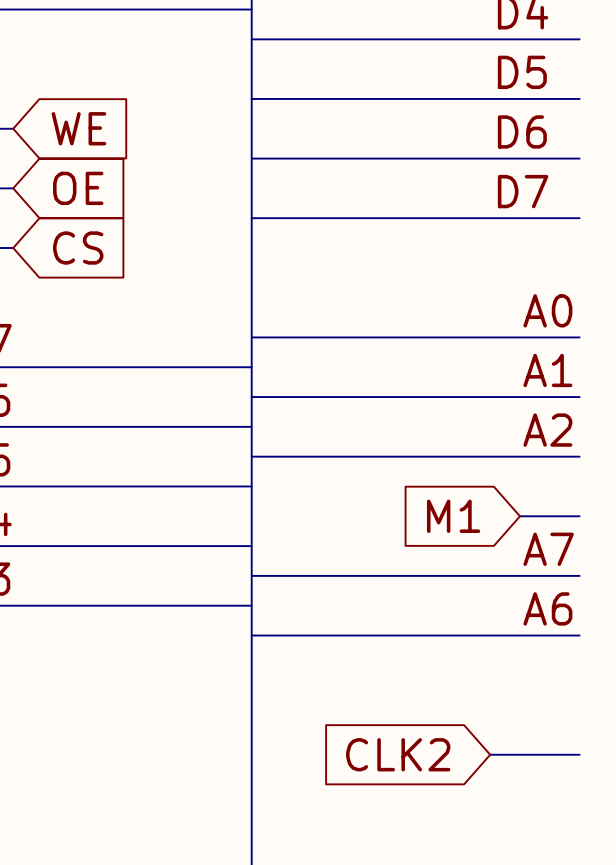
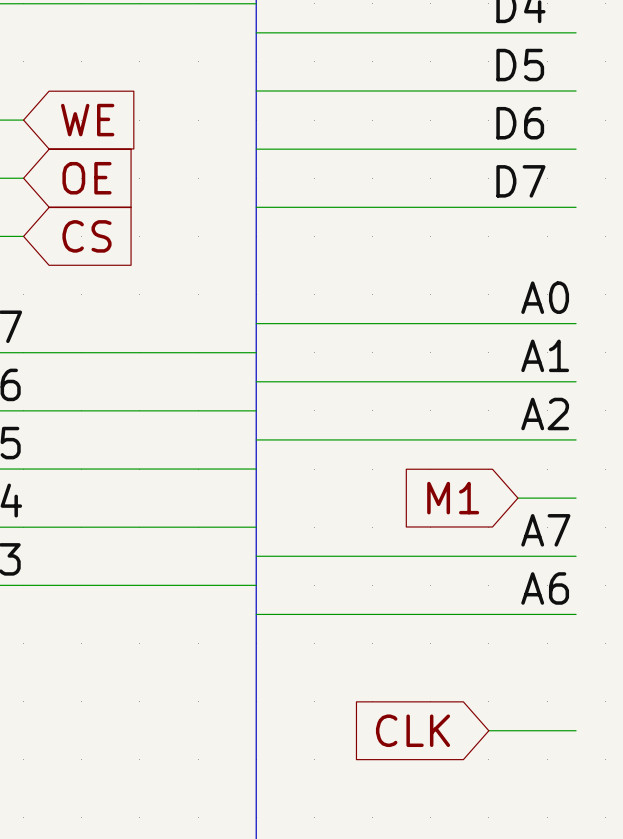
global label: CLK2 (398, 754) -> CLK (412, 730)

